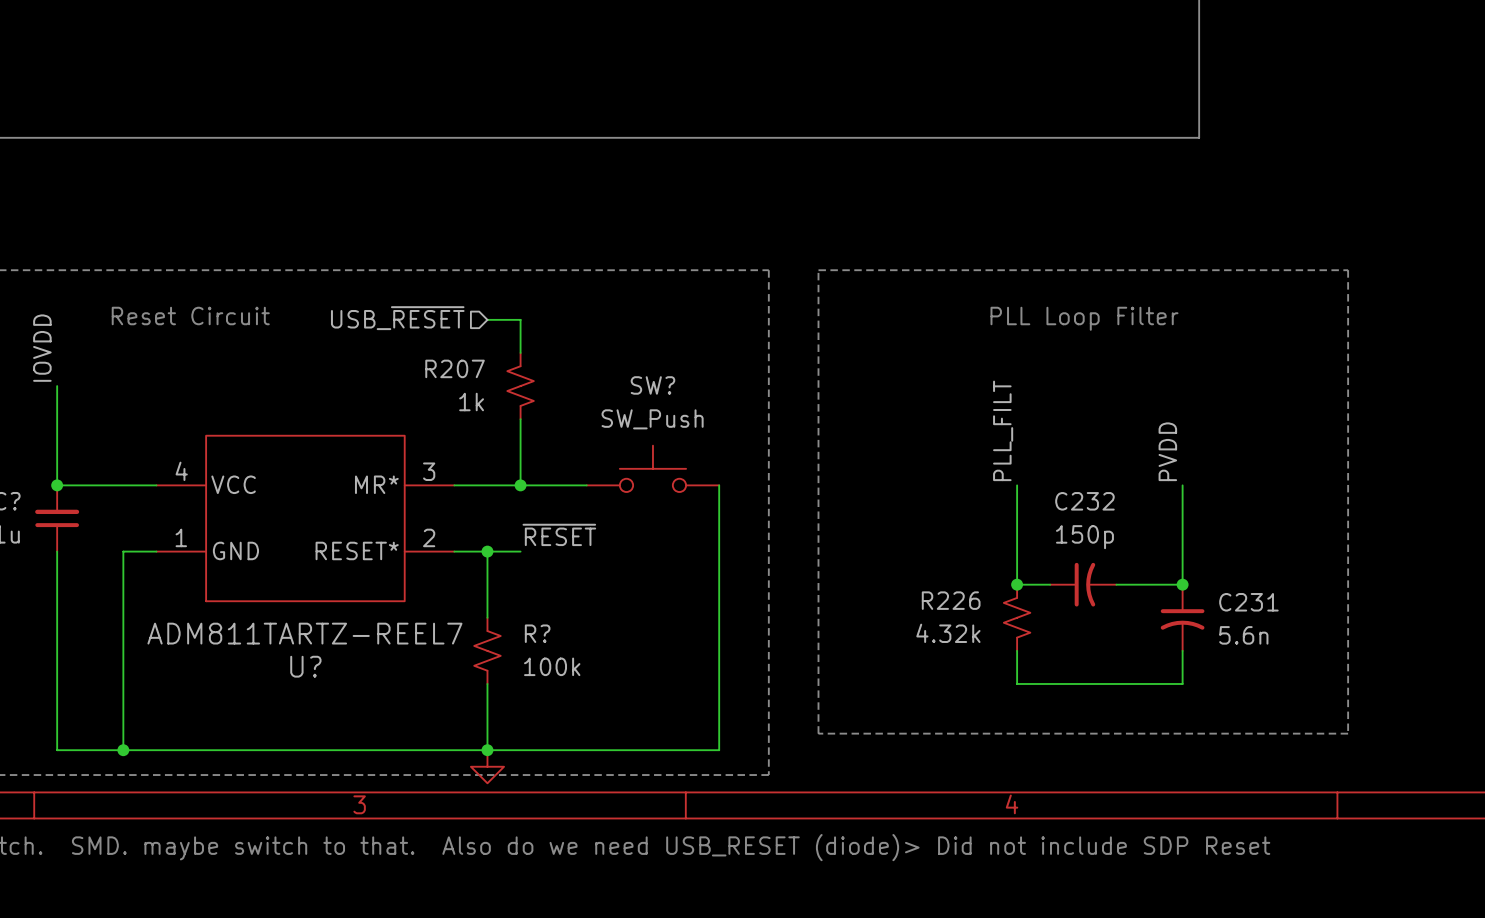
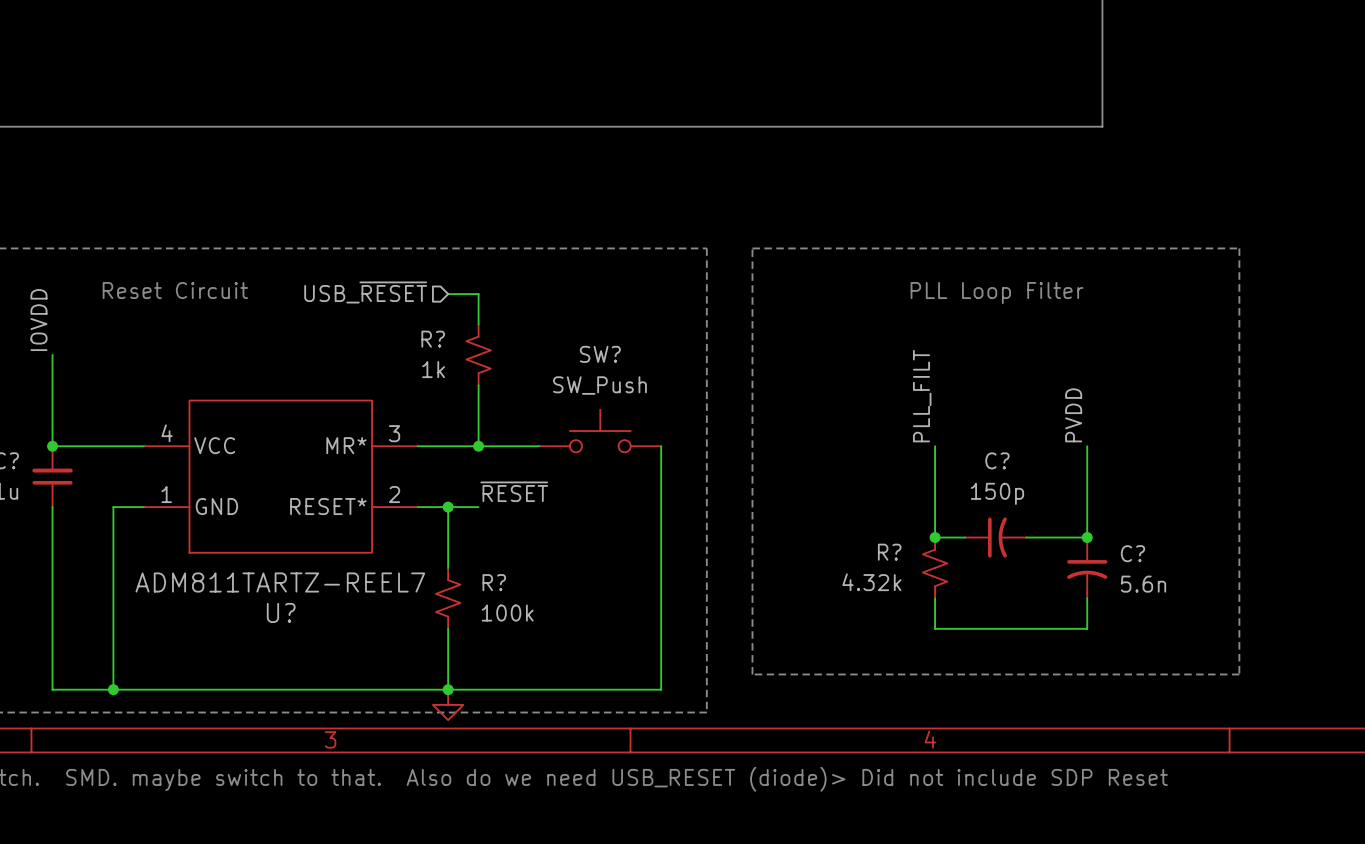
R207 name: R207 (455, 368) -> R? (433, 339)
C232 name: C232 (1084, 501) -> C? (997, 460)
R226 name: R226 (951, 600) -> R? (889, 552)
C231 name: C231 (1248, 602) -> C? (1132, 553)

